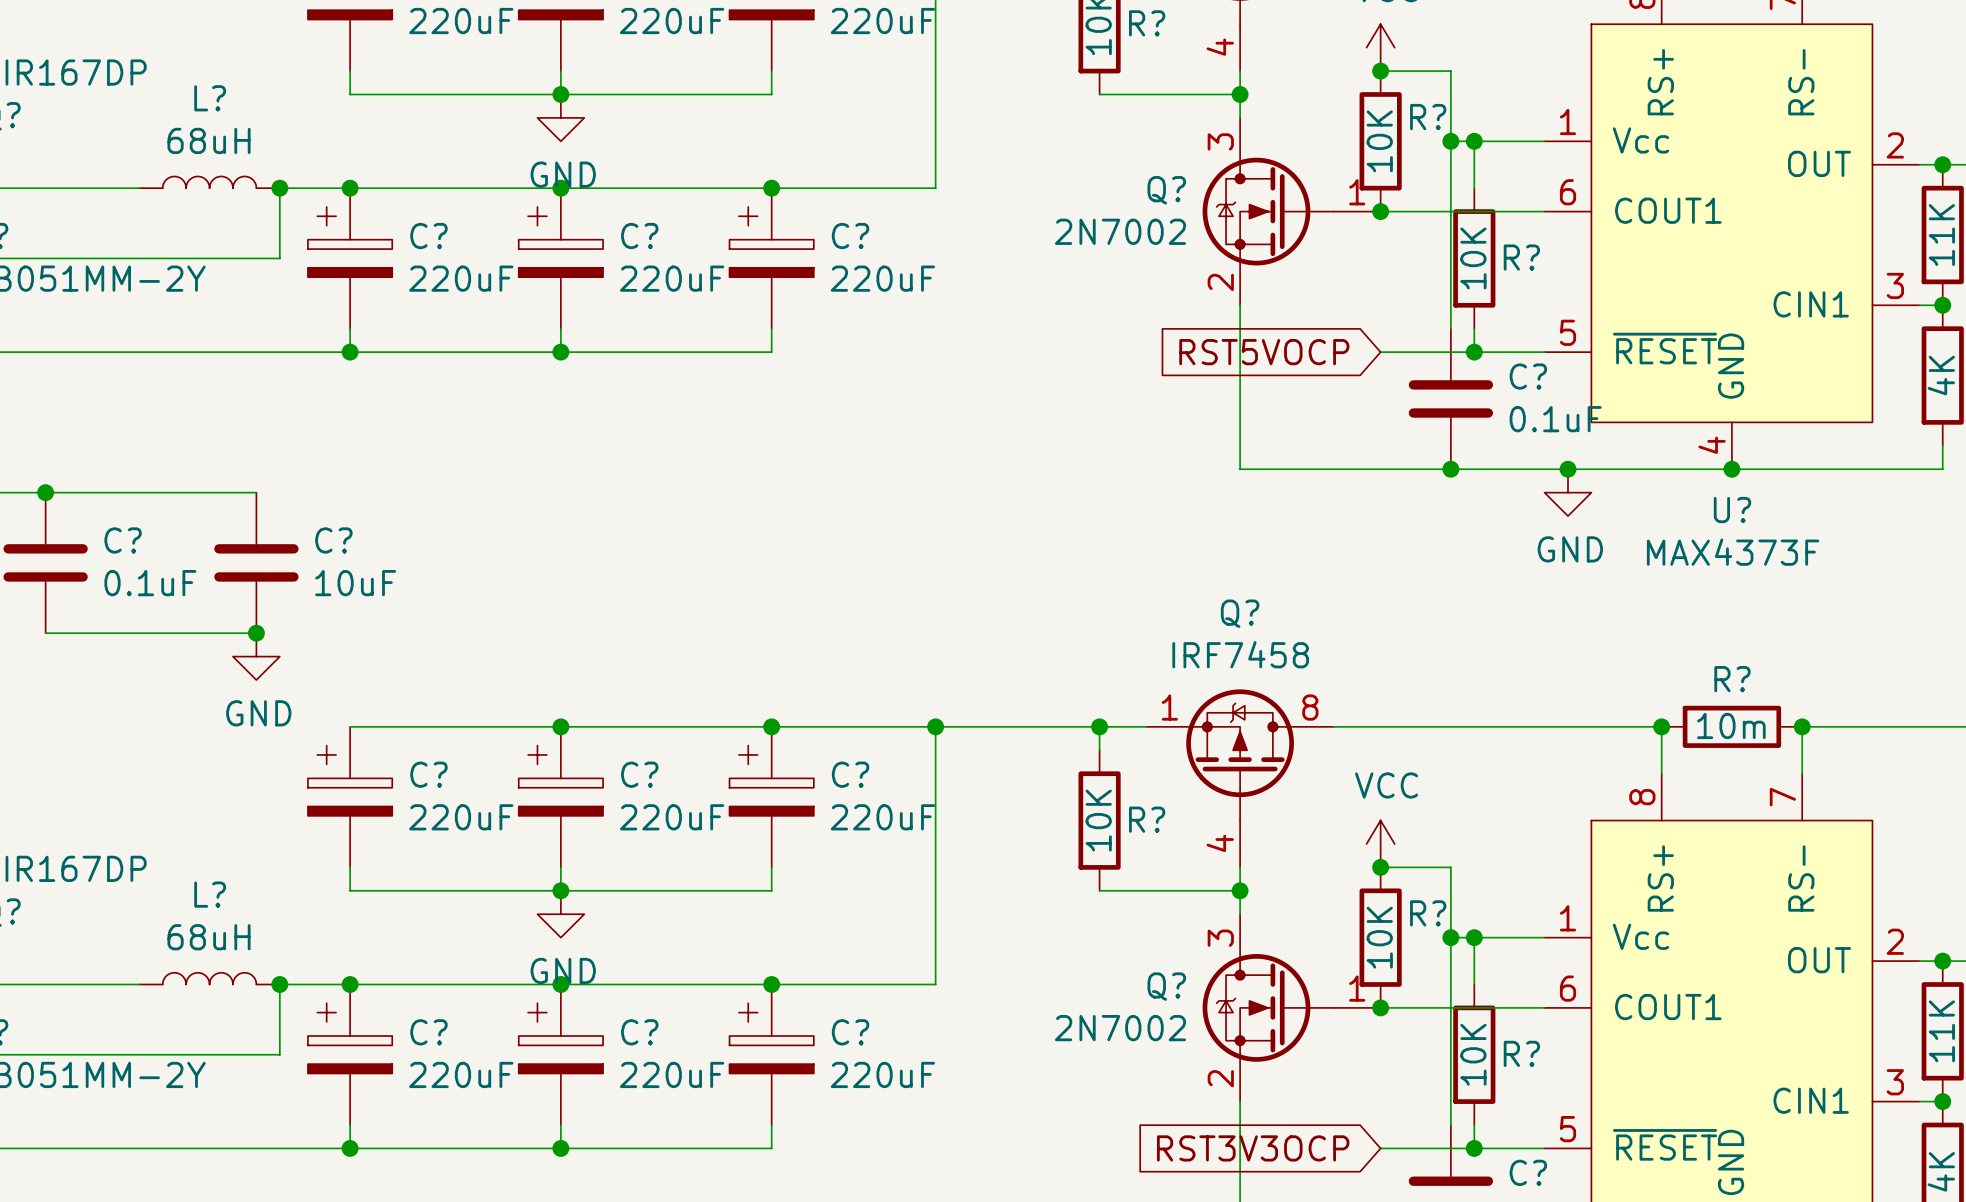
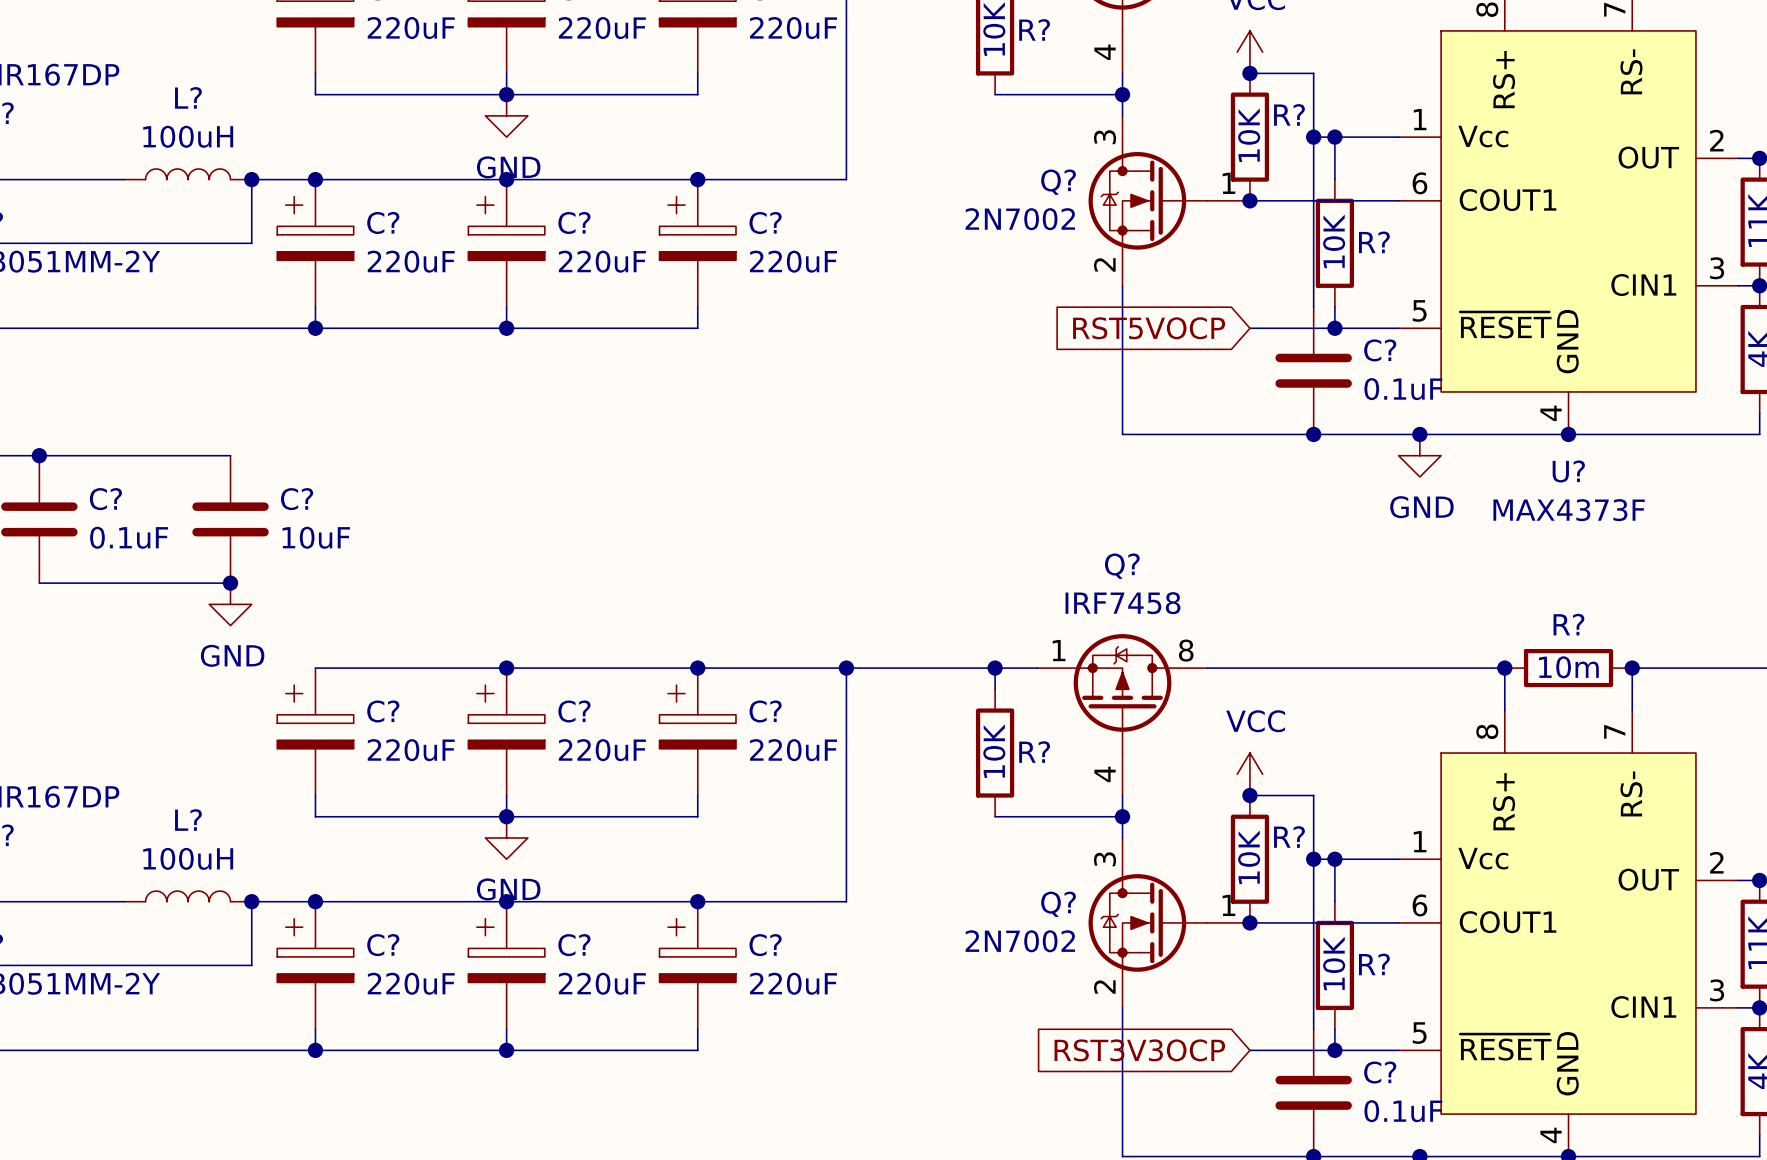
L? value: 68uH (209, 140) -> 100uH (188, 136)
L? value: 68uH (209, 937) -> 100uH (188, 858)

